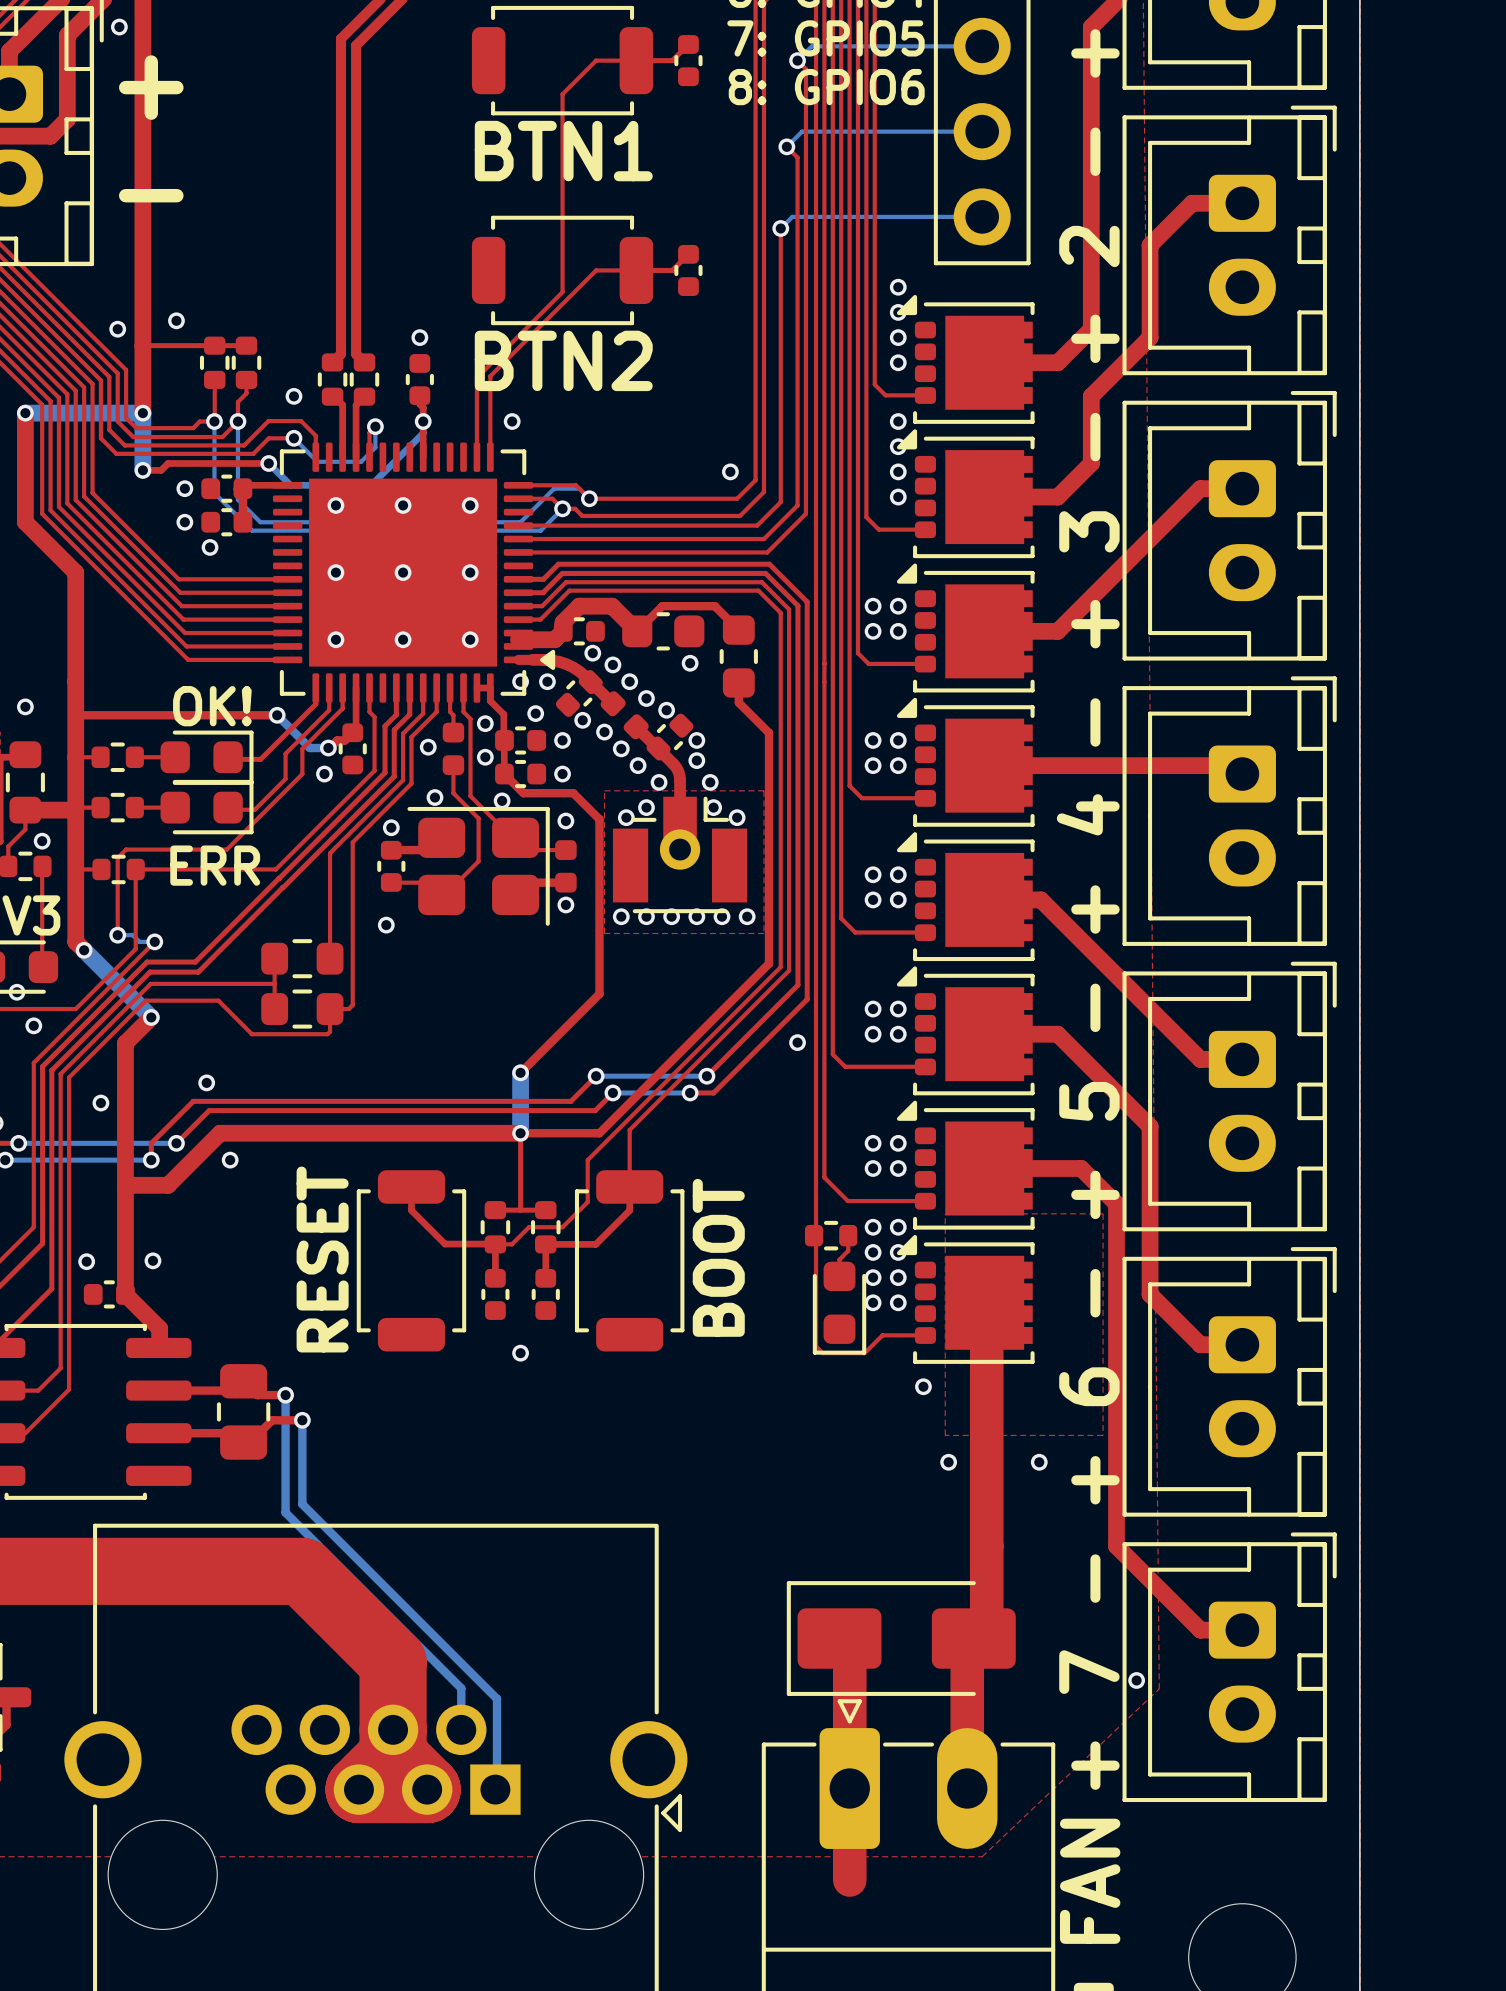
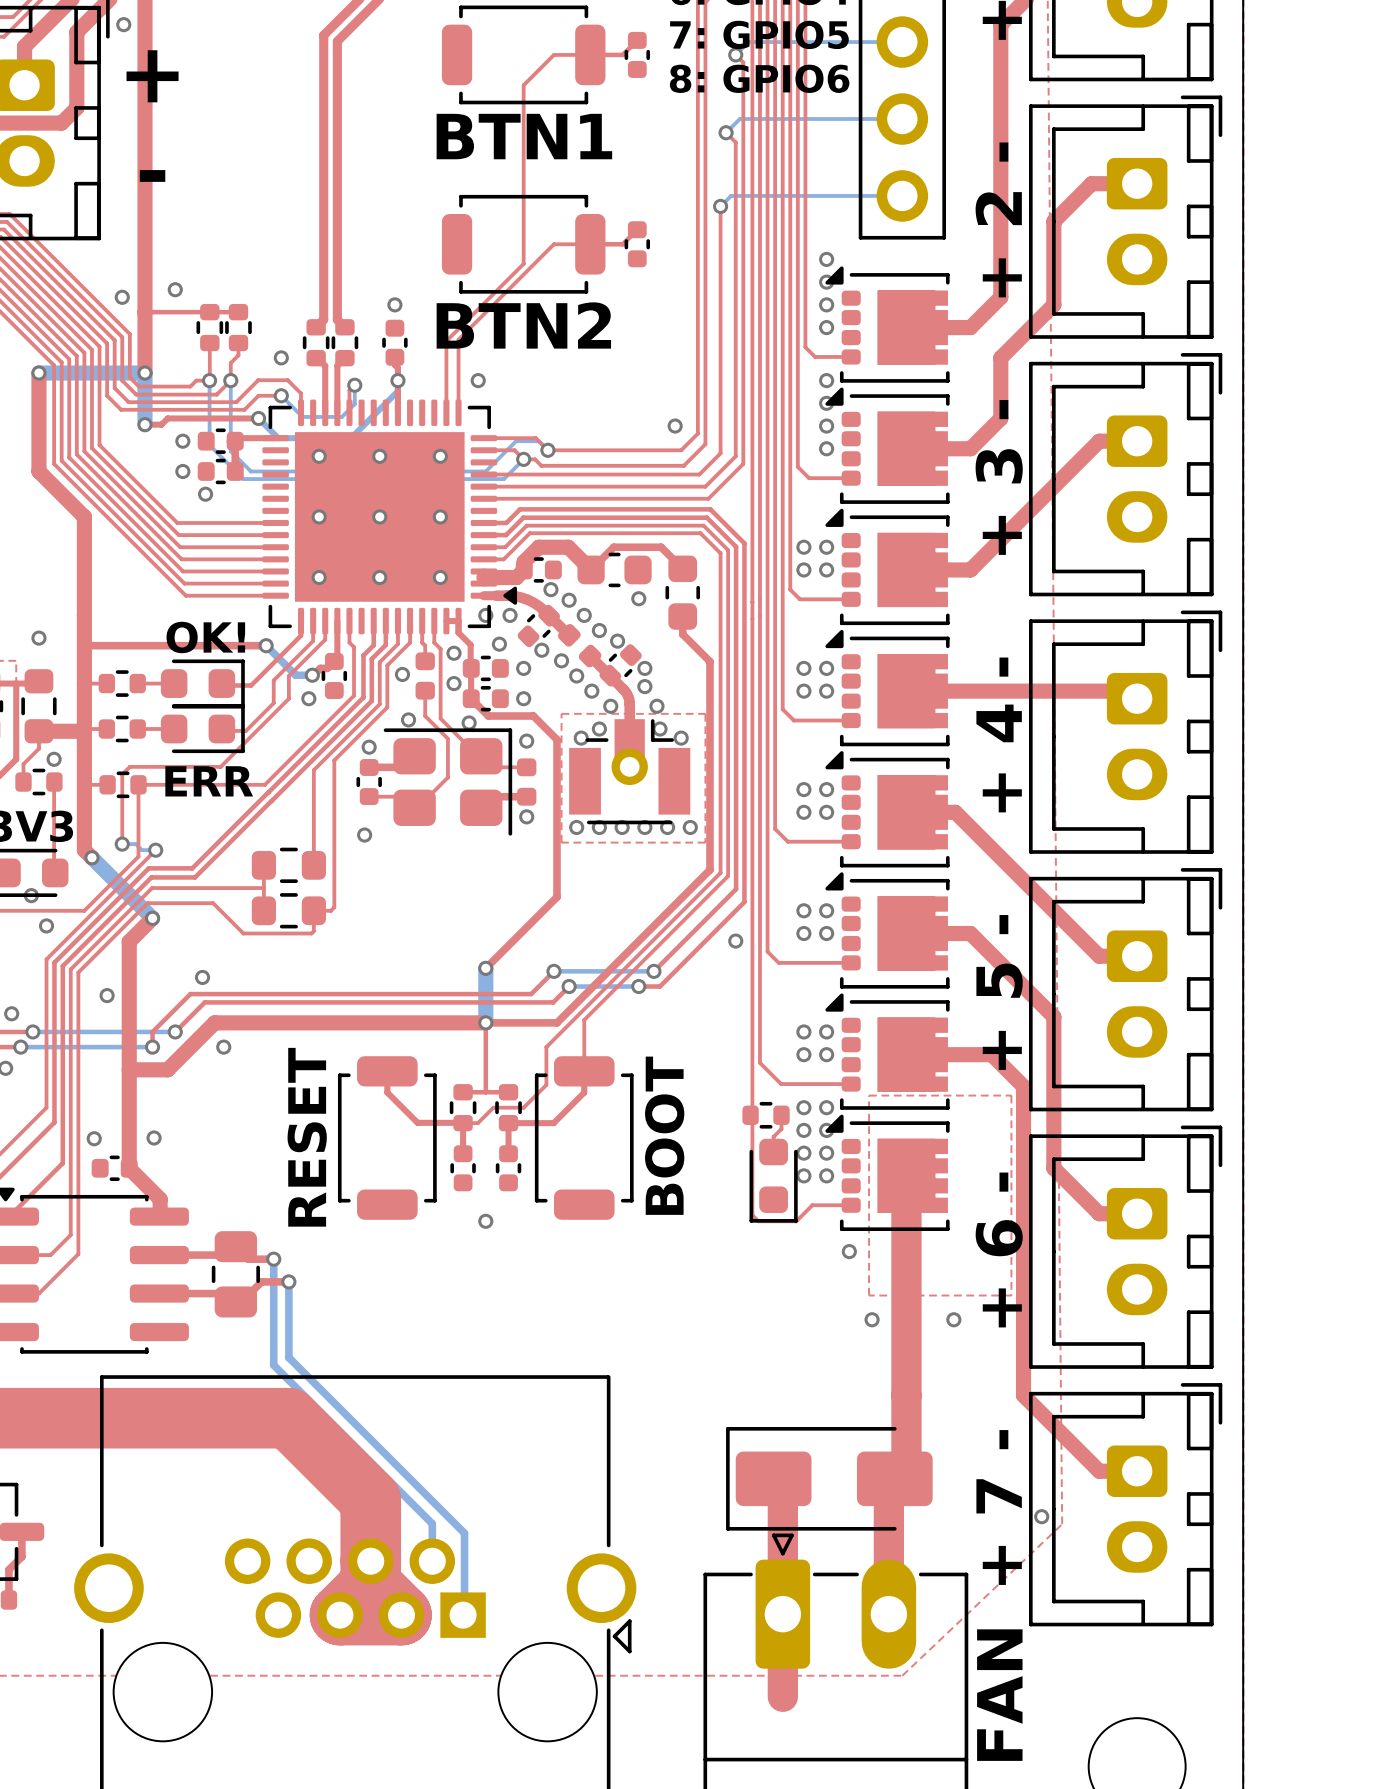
part footprint: [896, 294, 1035, 424] -> [825, 266, 950, 383]
part footprint: [896, 429, 1035, 559] -> [825, 387, 950, 504]
part footprint: [896, 563, 1035, 693] -> [825, 508, 950, 626]
part footprint: [896, 697, 1035, 827] -> [825, 629, 950, 747]
part footprint: [896, 832, 1035, 962] -> [825, 751, 950, 868]
part footprint: [896, 966, 1035, 1096] -> [825, 872, 950, 989]
part footprint: [896, 1100, 1035, 1230] -> [825, 993, 950, 1110]
part footprint: [896, 1234, 1035, 1364] -> [825, 1114, 950, 1232]

